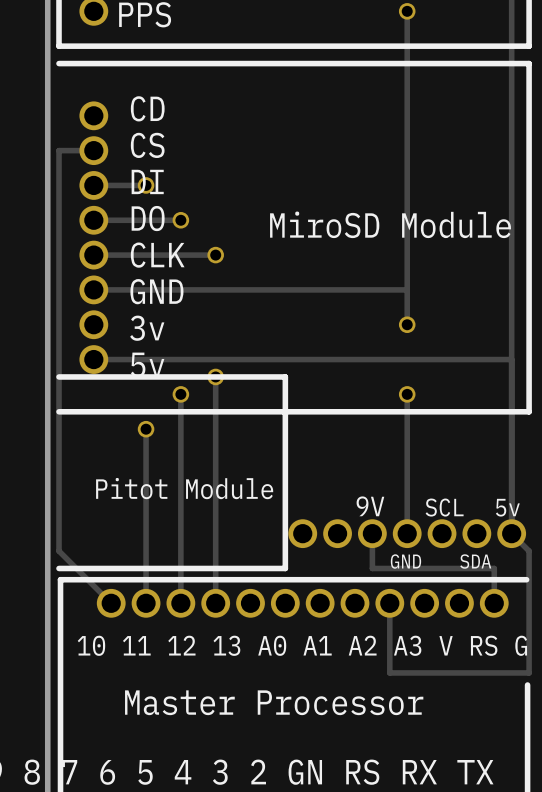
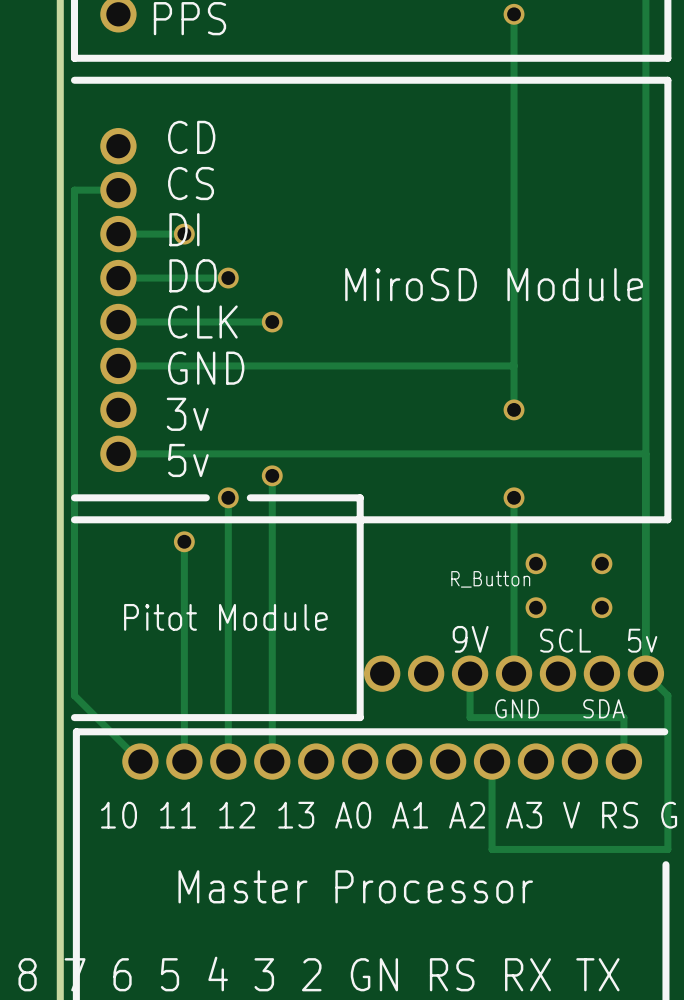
line: (59, 376) (285, 376) (285, 394) -> (250, 497) (360, 497)
line: none -> (74, 497) (206, 497)
via: none -> (536, 563)
via: none -> (601, 563)
text: none -> R_Button (490, 579)
via: none -> (536, 607)
via: none -> (601, 607)

